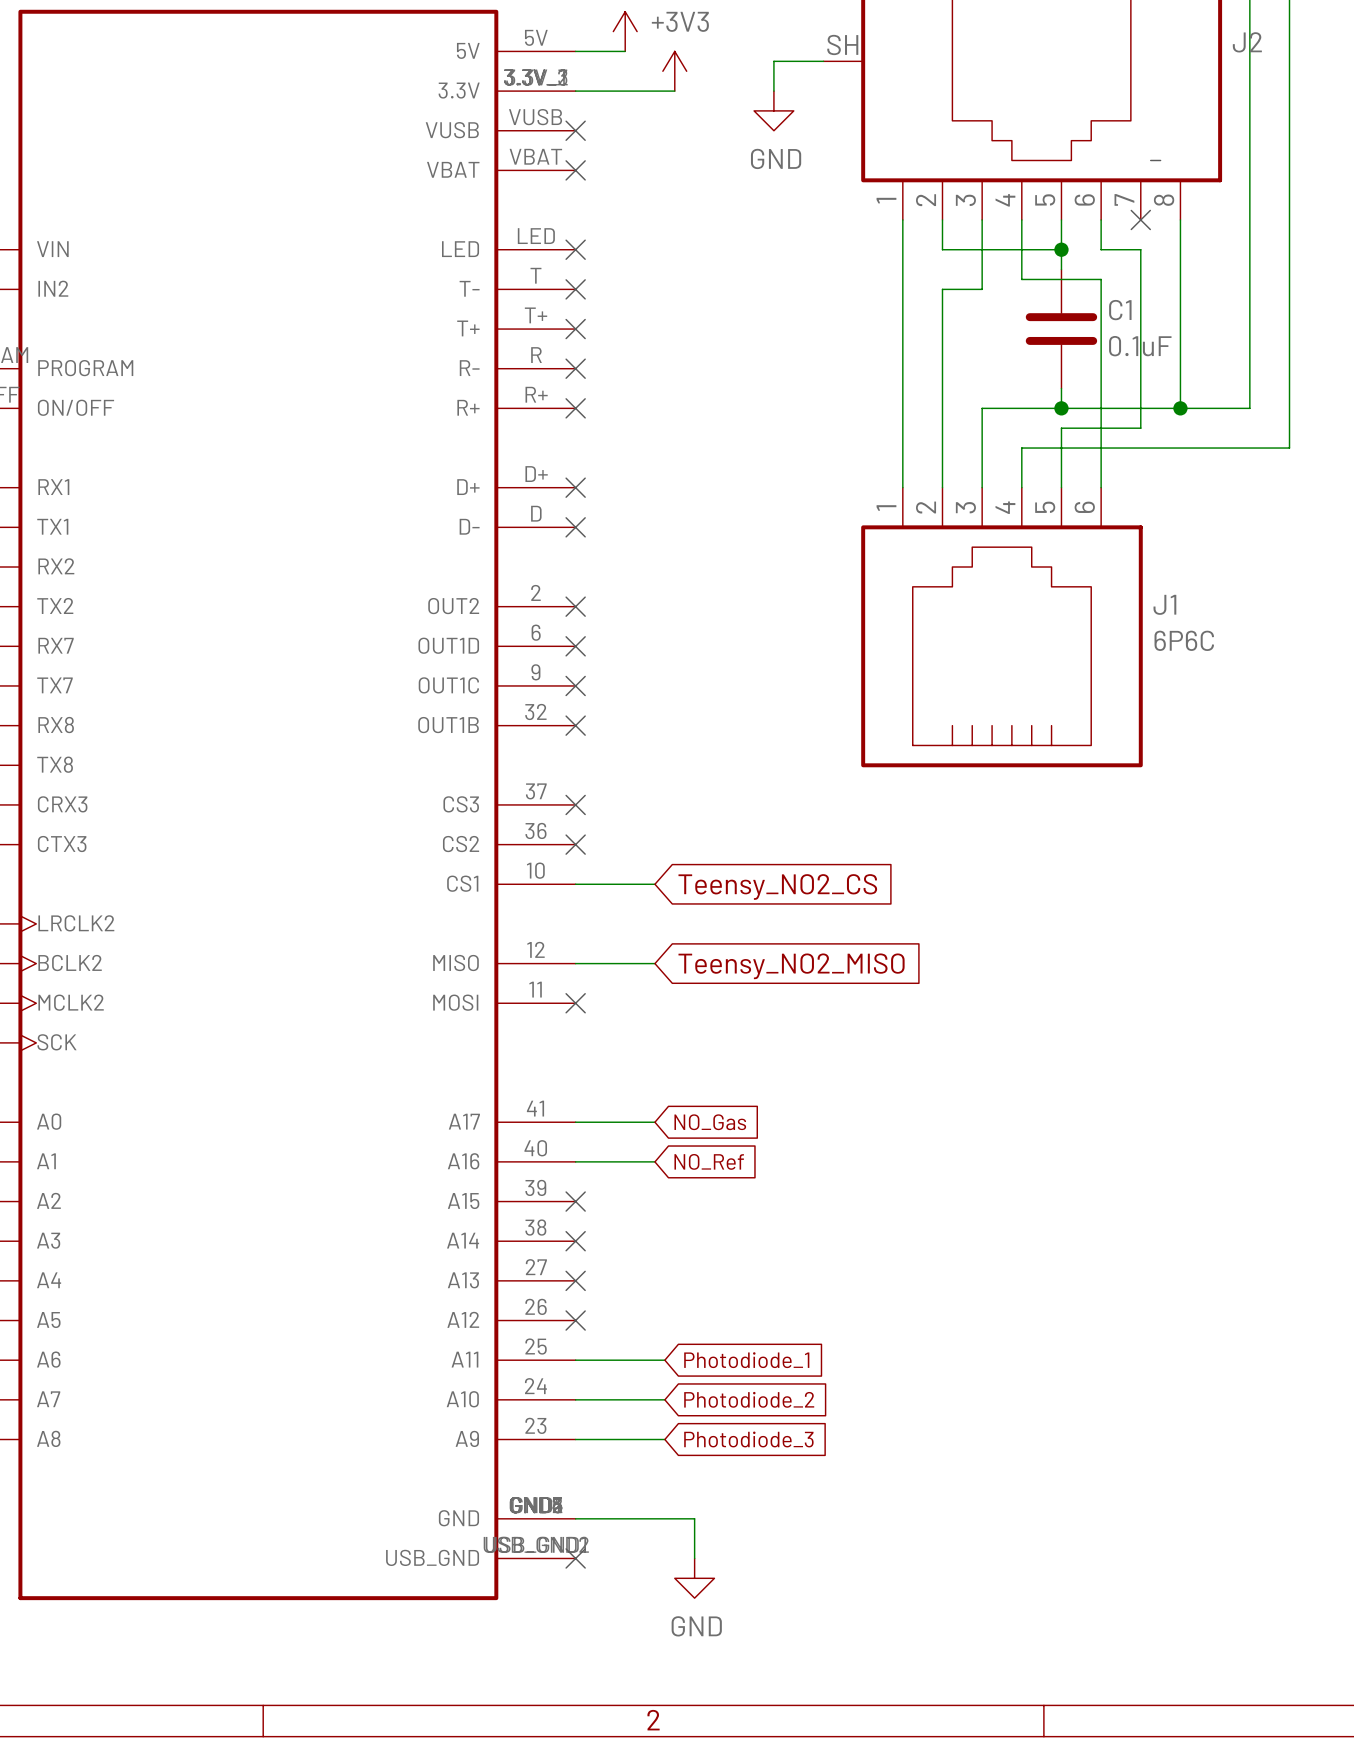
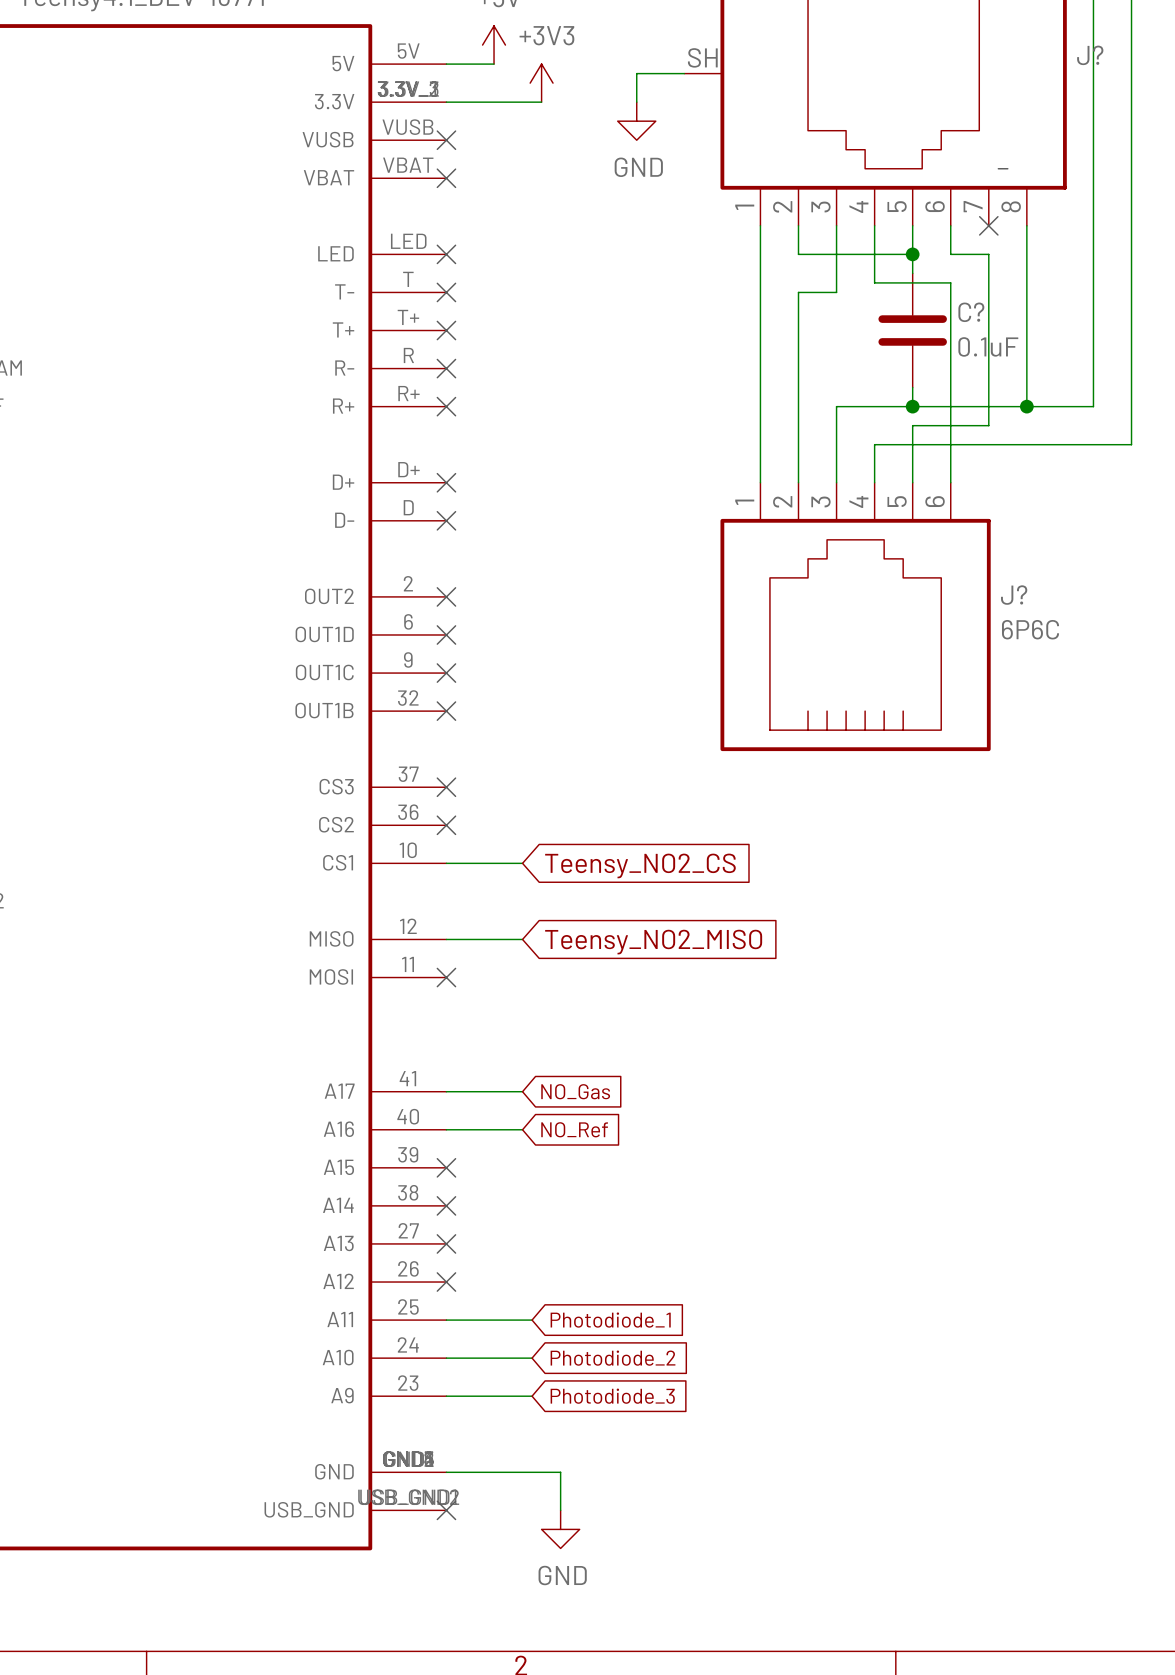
J2 name: J2 (1247, 42) -> J? (1090, 55)
C1 name: C1 (1120, 310) -> C? (971, 312)
J1 name: J1 (1164, 604) -> J? (1014, 595)

